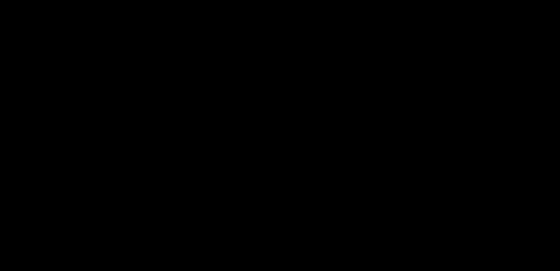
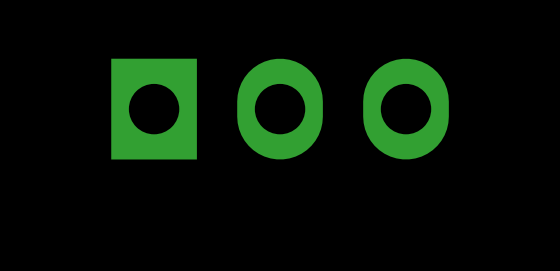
part: none -> (280, 109)

